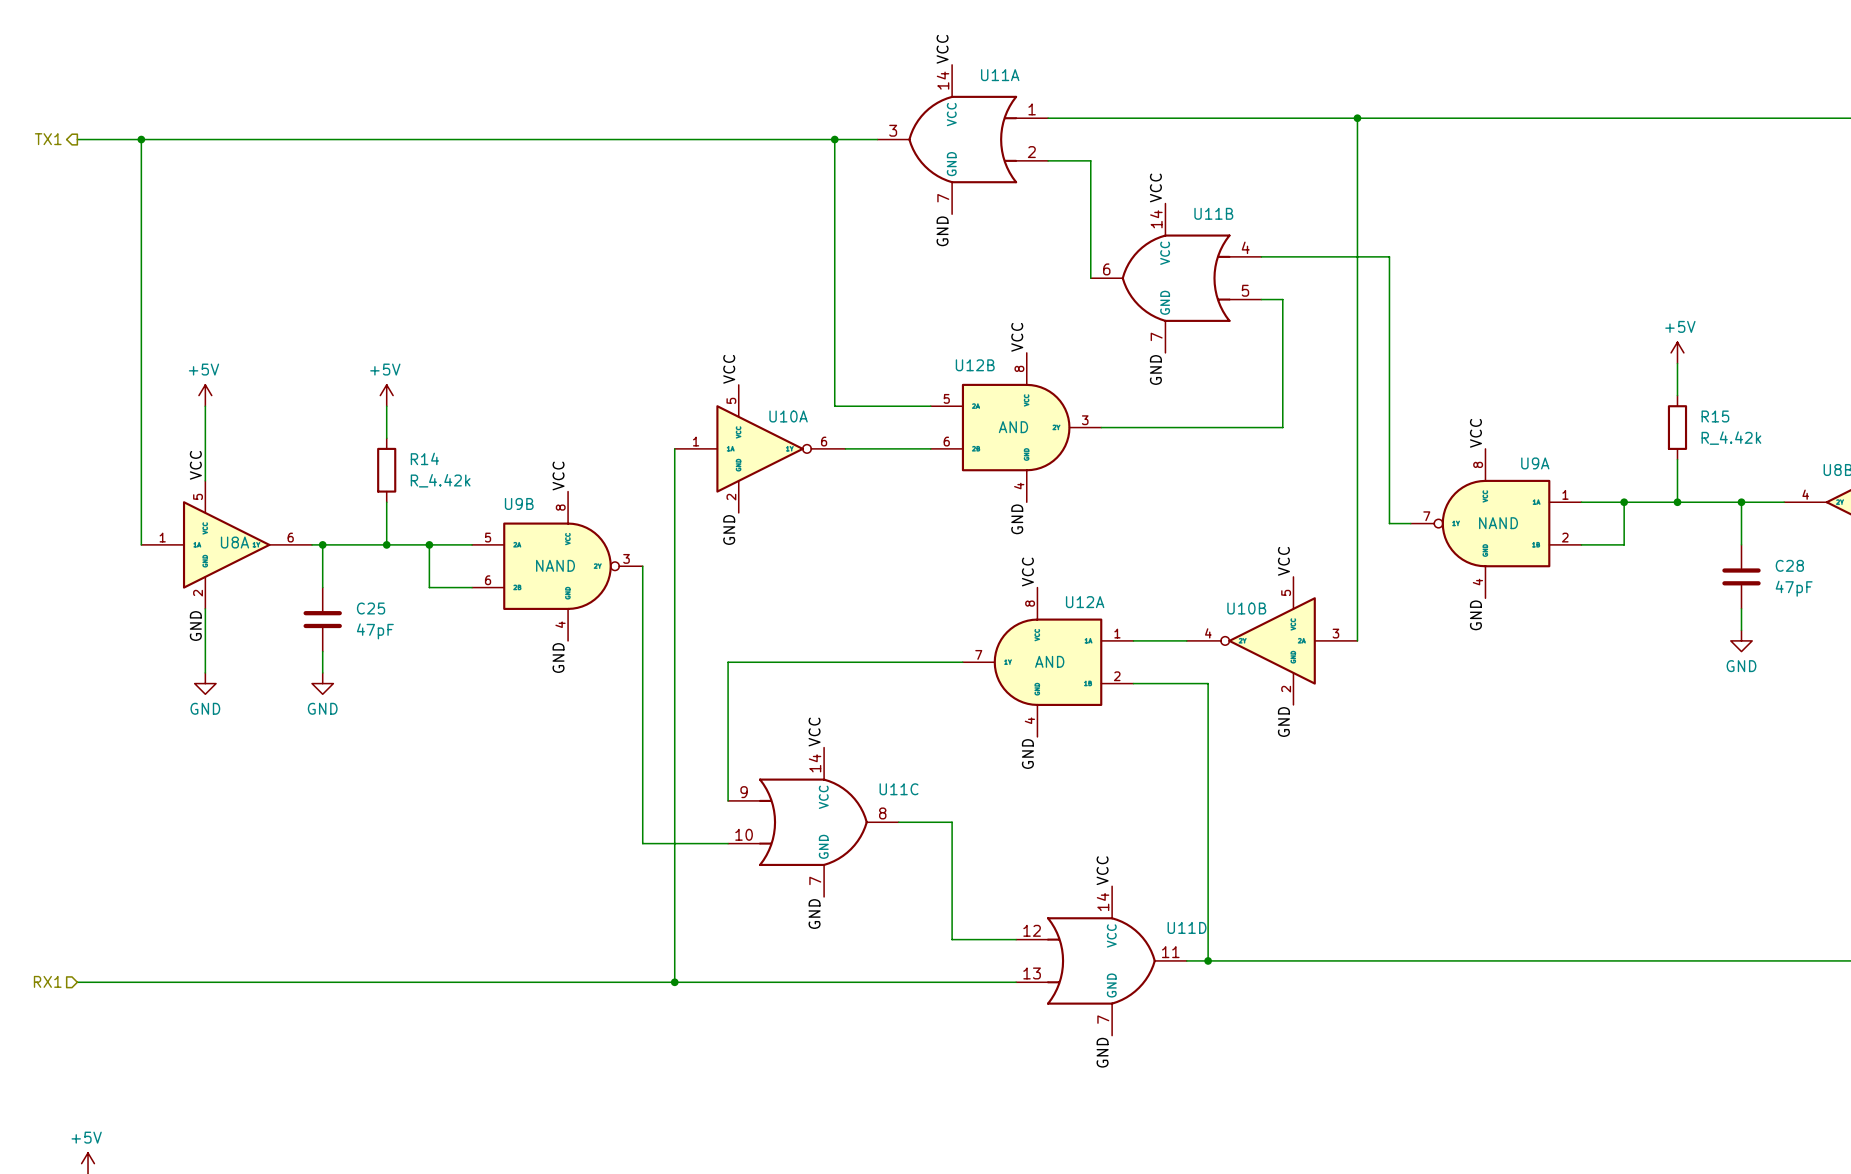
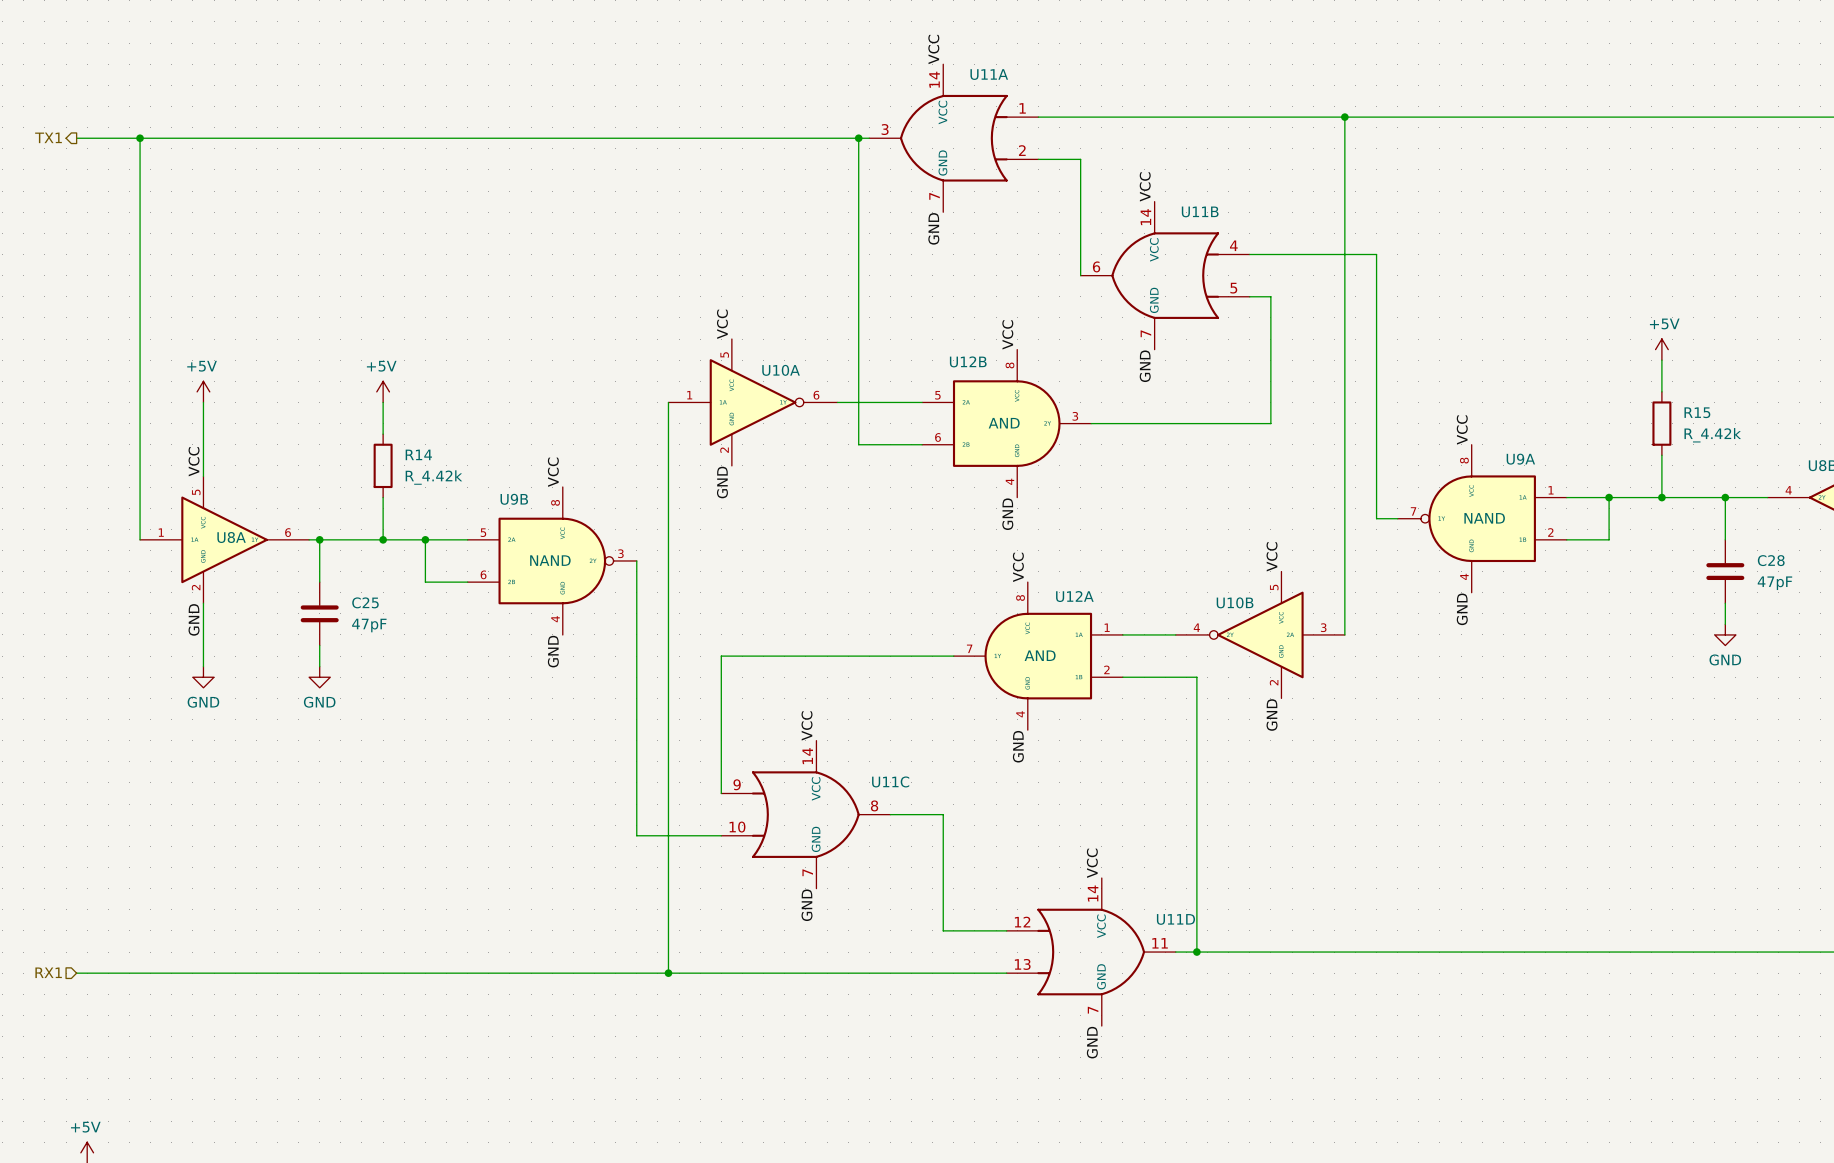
wire: (834, 139) (834, 406) (845, 406) -> none
junction position: (834, 139) -> (858, 138)
label position: VCC (729, 369) -> VCC (722, 324)
wire: none -> (668, 402) (668, 444)
U10A position: (760, 448) -> (753, 402)
wire: (845, 448) (866, 448) -> (858, 138) (858, 444)
label position: GND (729, 530) -> GND (722, 482)

